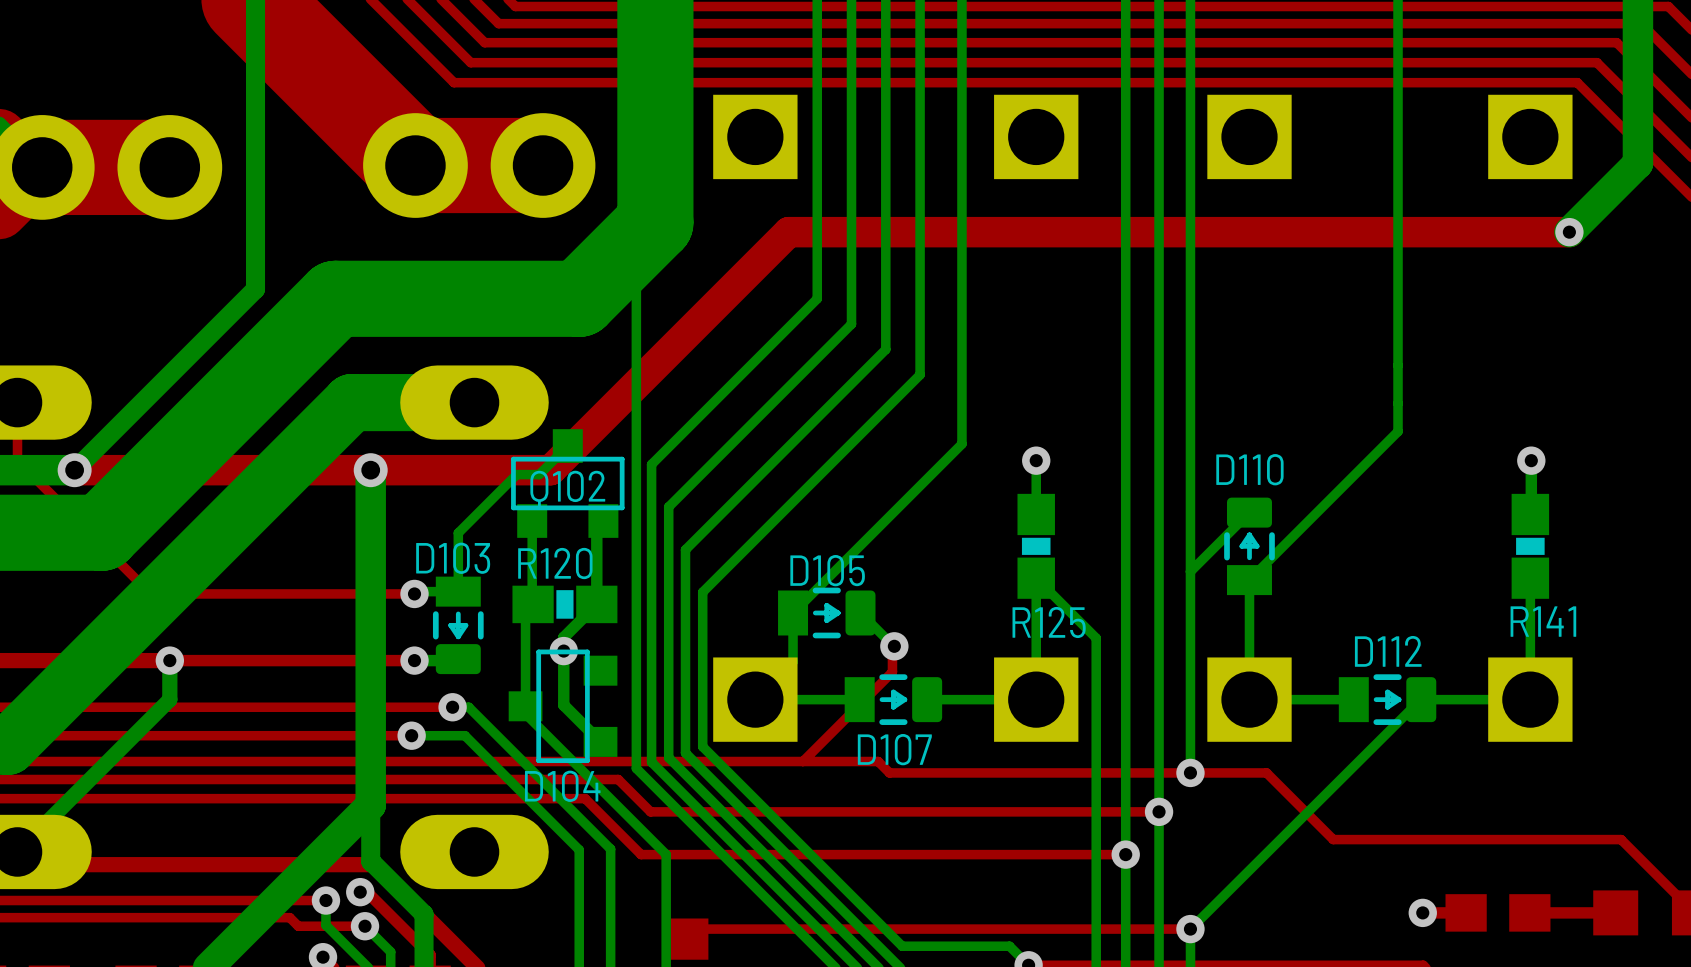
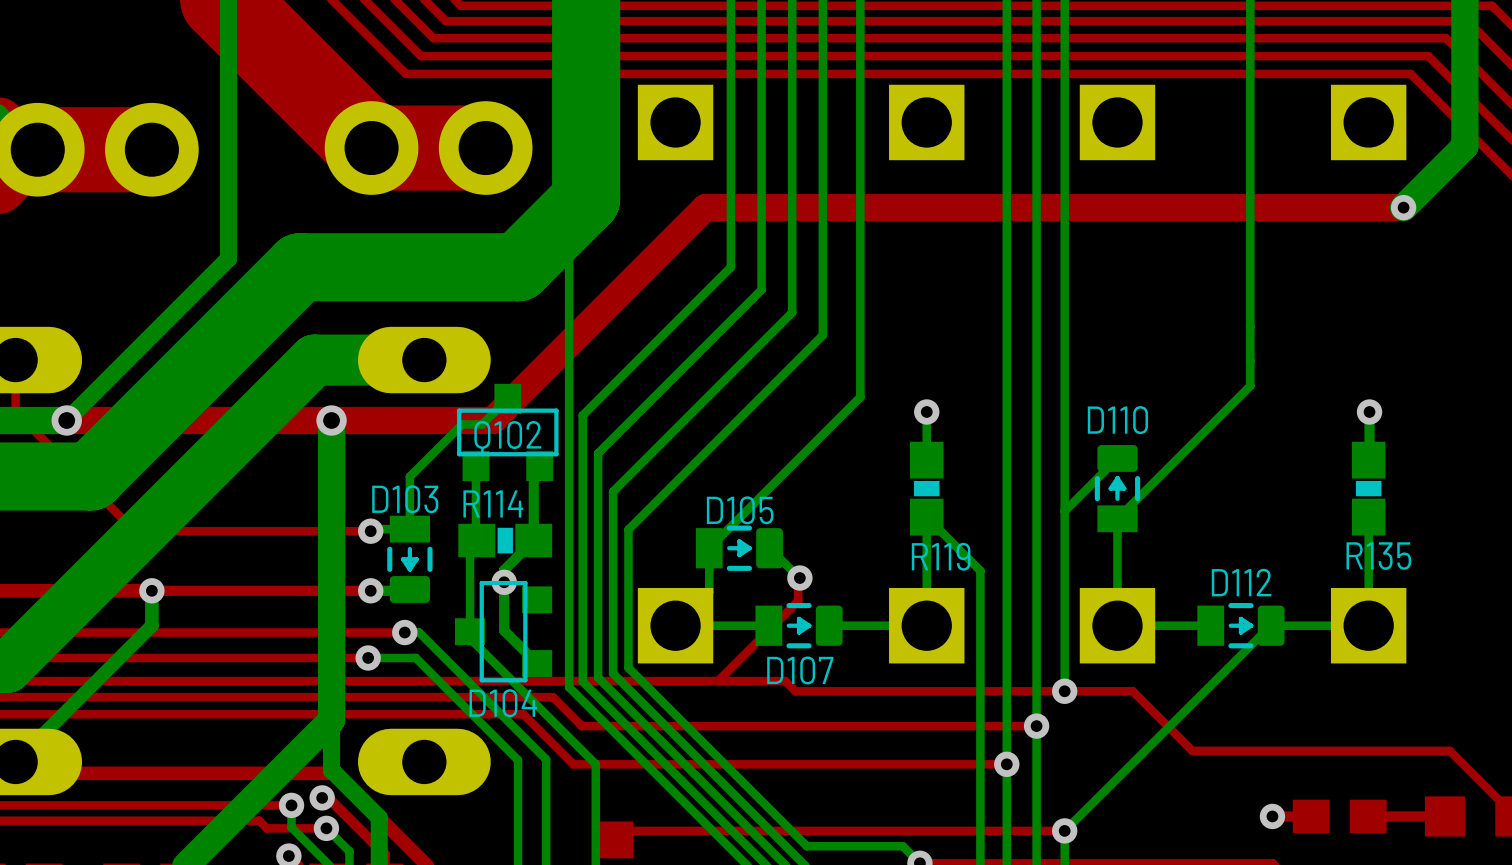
R120 name: R120 (555, 563) -> R114 (493, 503)
R141 name: R141 (1543, 621) -> R135 (1378, 556)
R125 name: R125 (1049, 622) -> R119 (941, 556)

